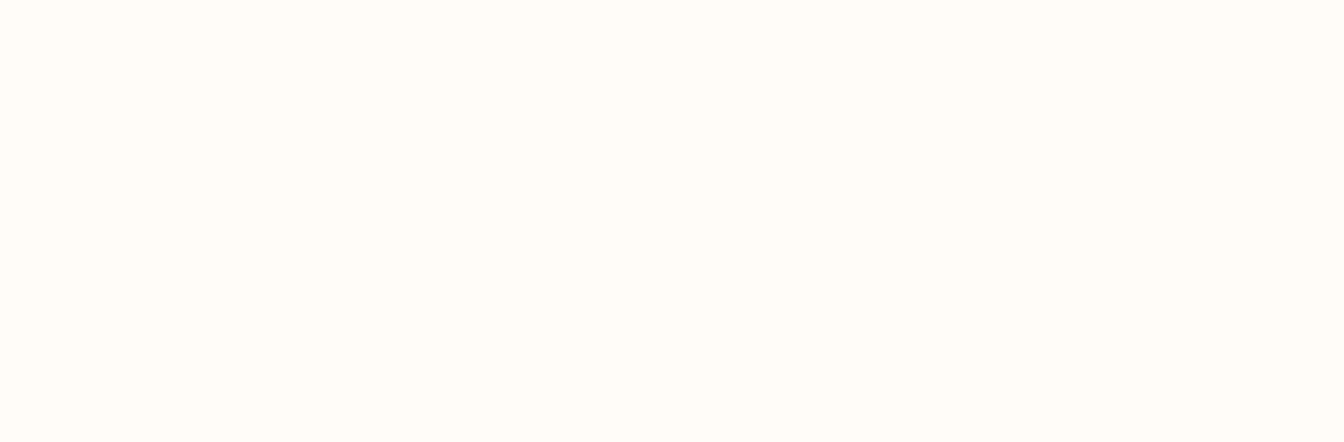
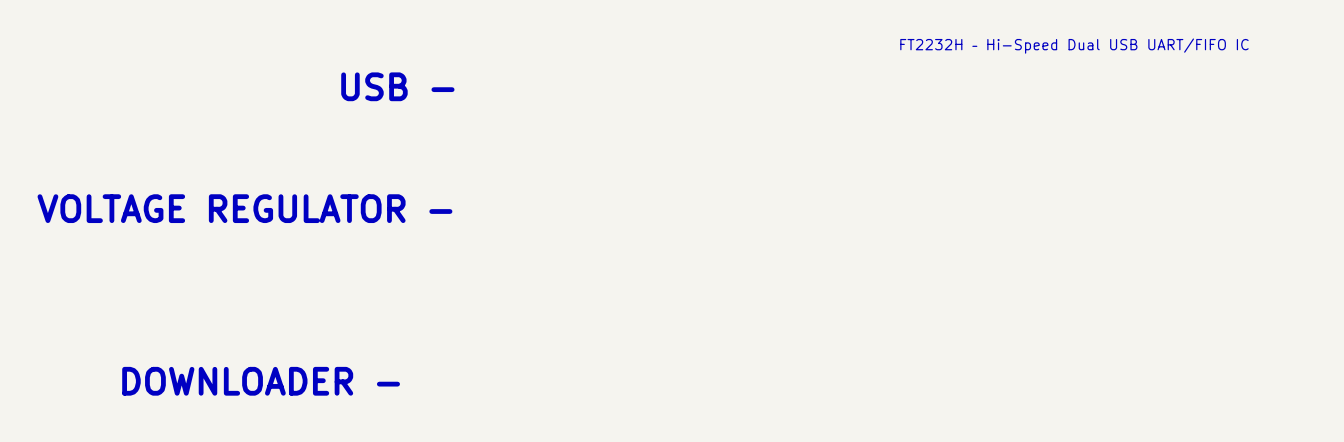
text: none -> FT2232H – Hi-Speed Dual USB UART/FIFO IC (1074, 46)
text: none -> USB - (397, 86)
text: none -> VOLTAGE REGULATOR - (244, 208)
text: none -> DOWNLOADER - (261, 381)

